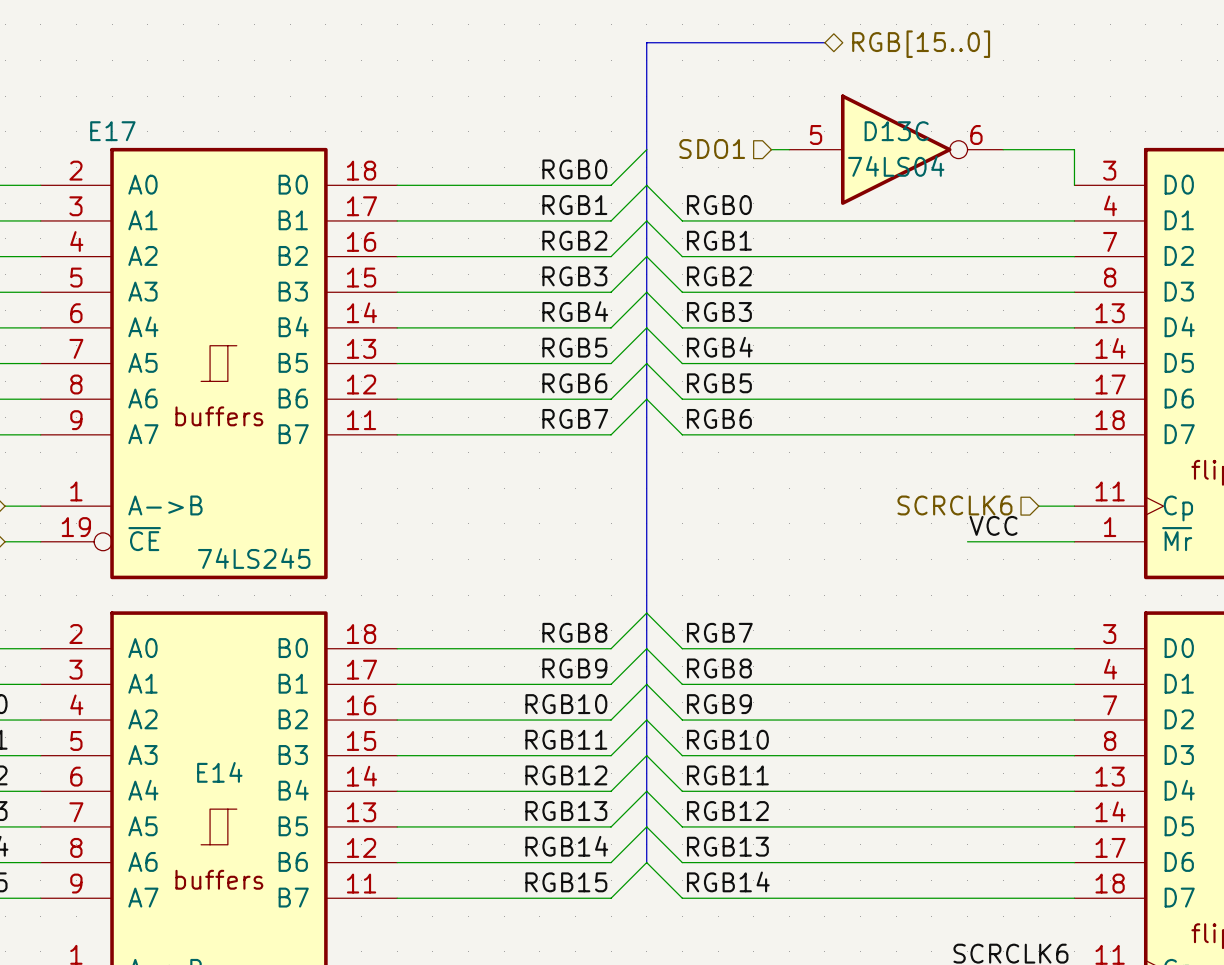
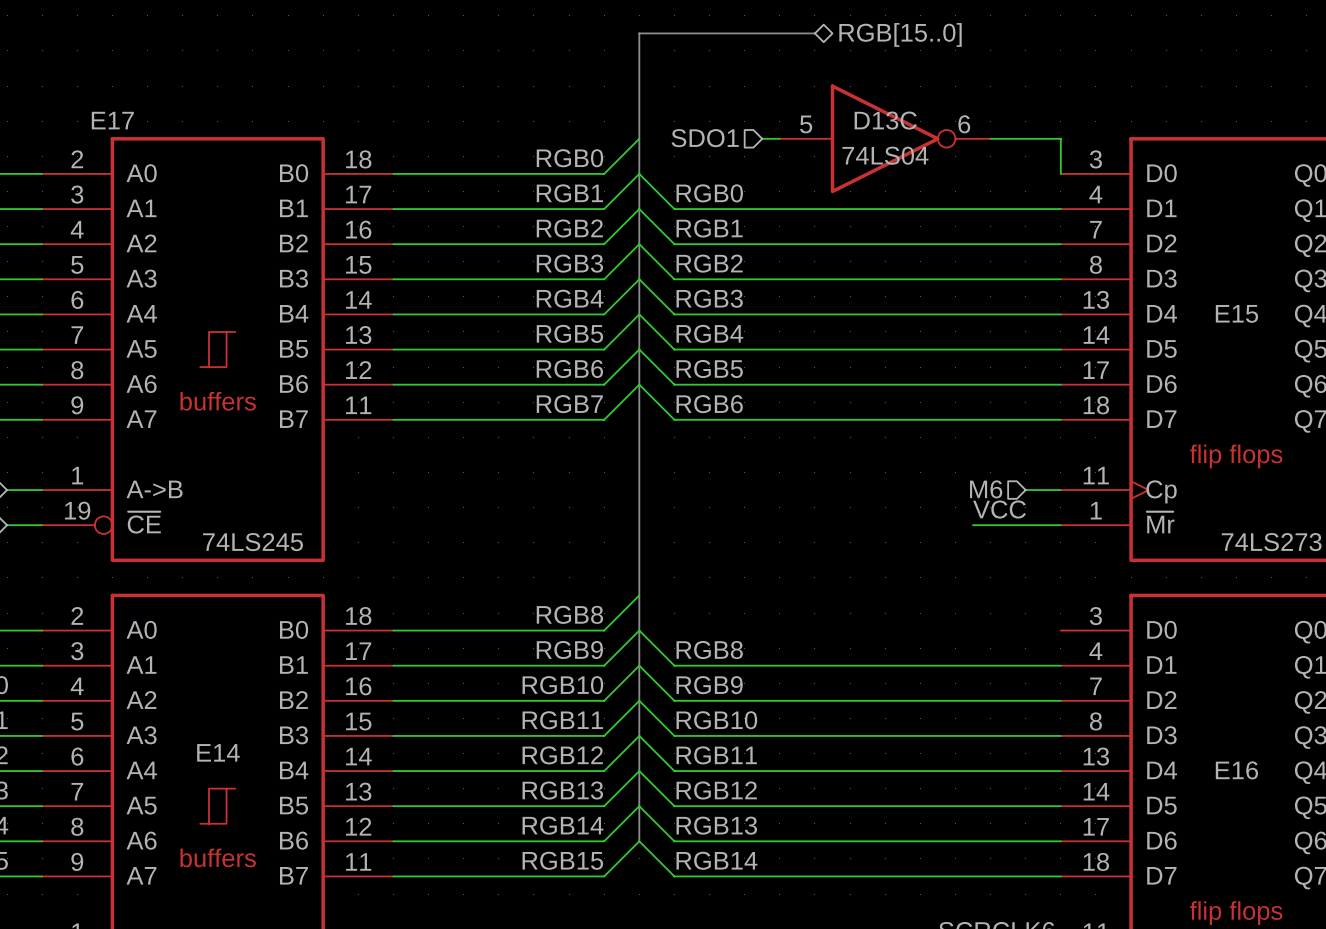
hierarchical label: SCRCLK6 (954, 505) -> M6 (986, 489)
label position: VCC (993, 525) -> VCC (999, 509)
wire: (967, 541) (985, 541) -> none
wire: (646, 613) (682, 648) (1074, 648) -> none
label: RGB7 (719, 632) -> none

